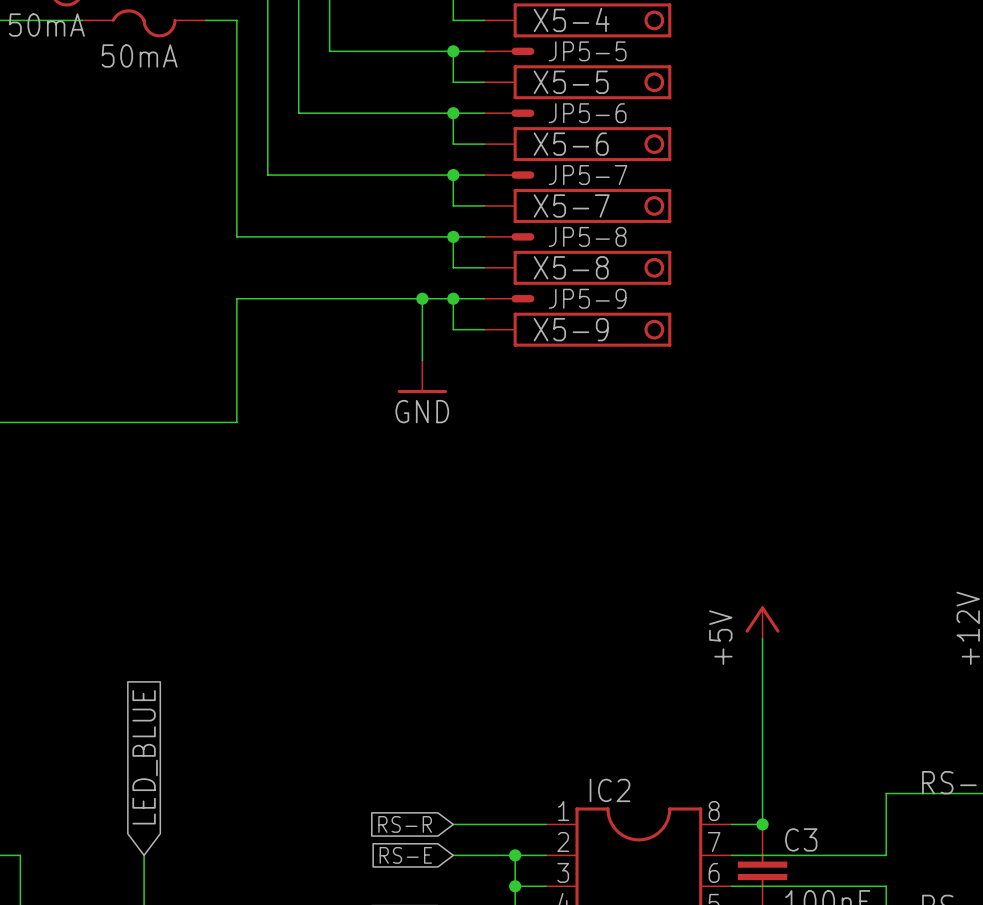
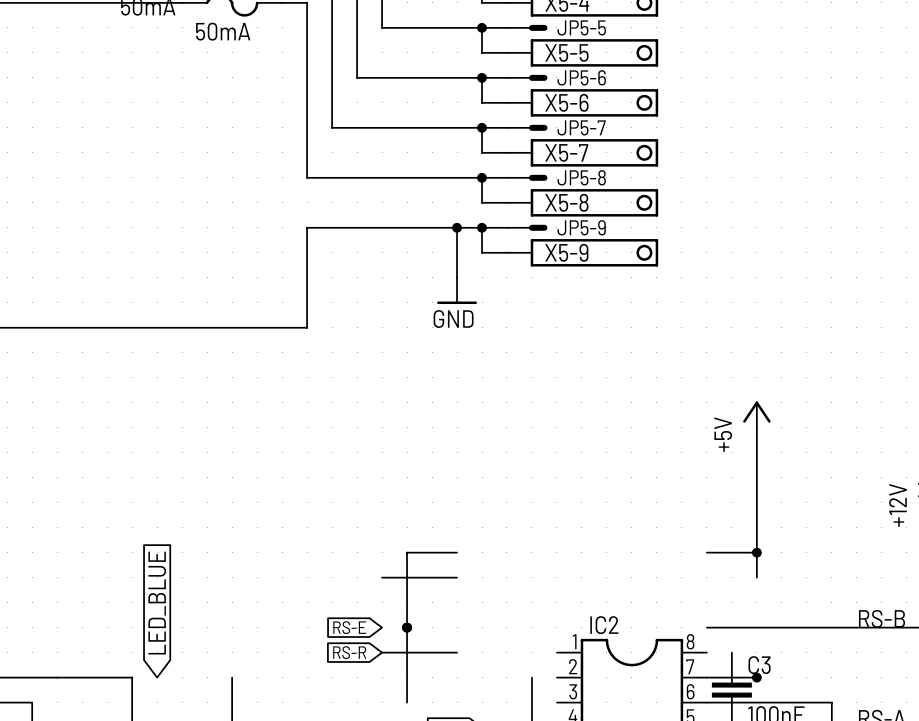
wire: none -> (756, 427) (756, 577)
power symbol position: +5V (762, 622) -> +5V (756, 414)
wire: (762, 638) (762, 824) (731, 824) -> none
wire: none -> (457, 552) (407, 552) (407, 702)
wire: none -> (706, 552) (756, 552)
junction: none -> (756, 552)
global label position: LED_BLUE (145, 757) -> LED_BLUE (157, 603)
junction: none -> (407, 627)
wire: (886, 793) (886, 855) (793, 855) -> (831, 627) (706, 627)
global label position: RS-R (405, 824) -> RS-R (349, 652)
wire: (453, 824) (546, 824) -> (382, 652) (457, 652)
junction position: (762, 824) -> (756, 677)
global label position: RS-E (405, 855) -> RS-E (349, 627)
wire: (453, 855) (546, 855) -> (382, 577) (457, 577)
junction: (515, 855) -> none
wire: (515, 886) (546, 886) -> none
junction: (515, 886) -> none

